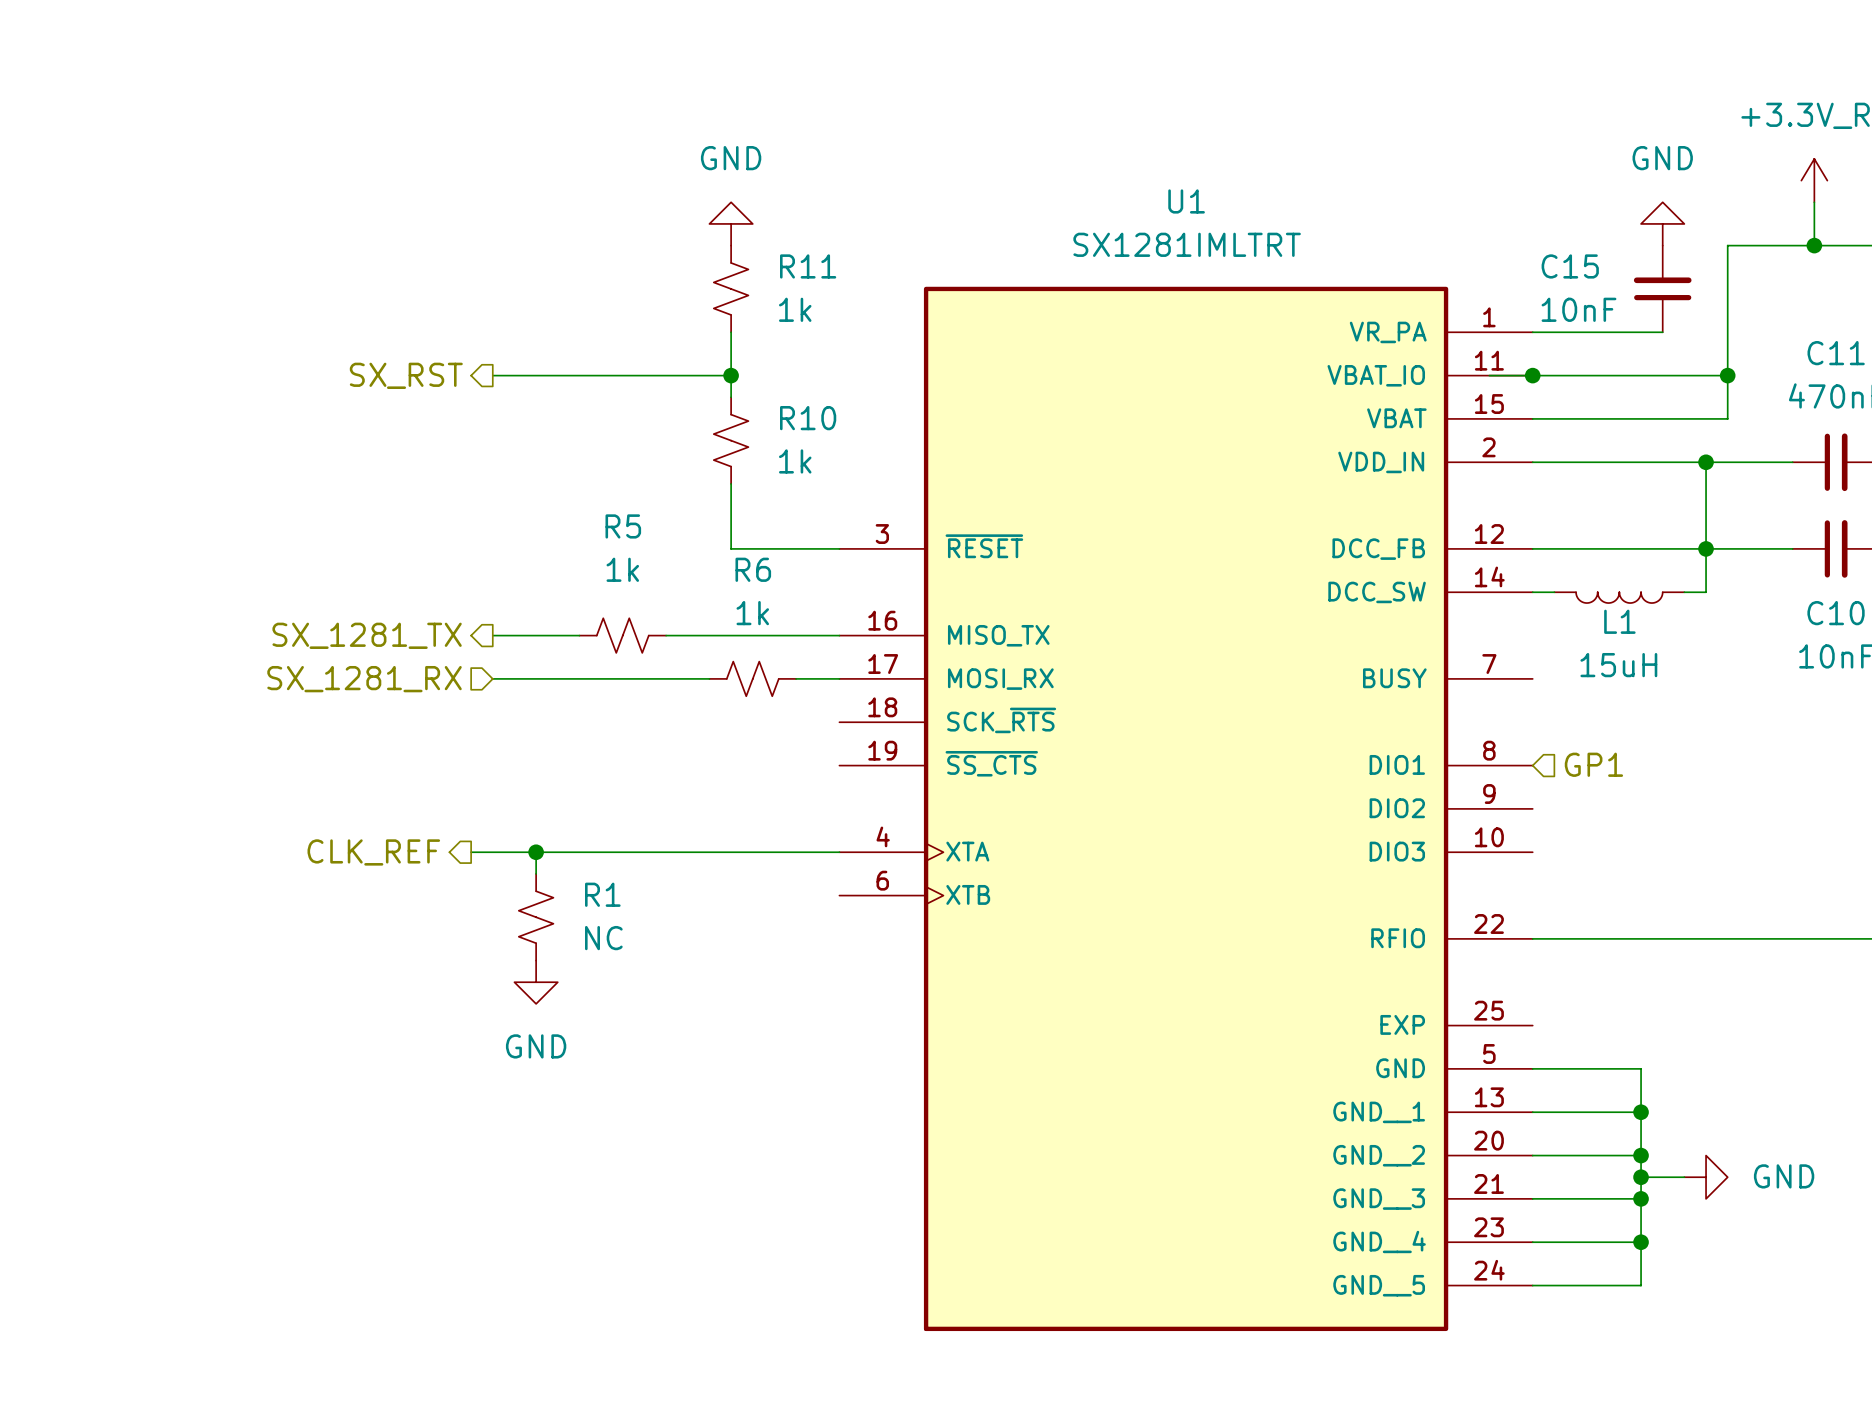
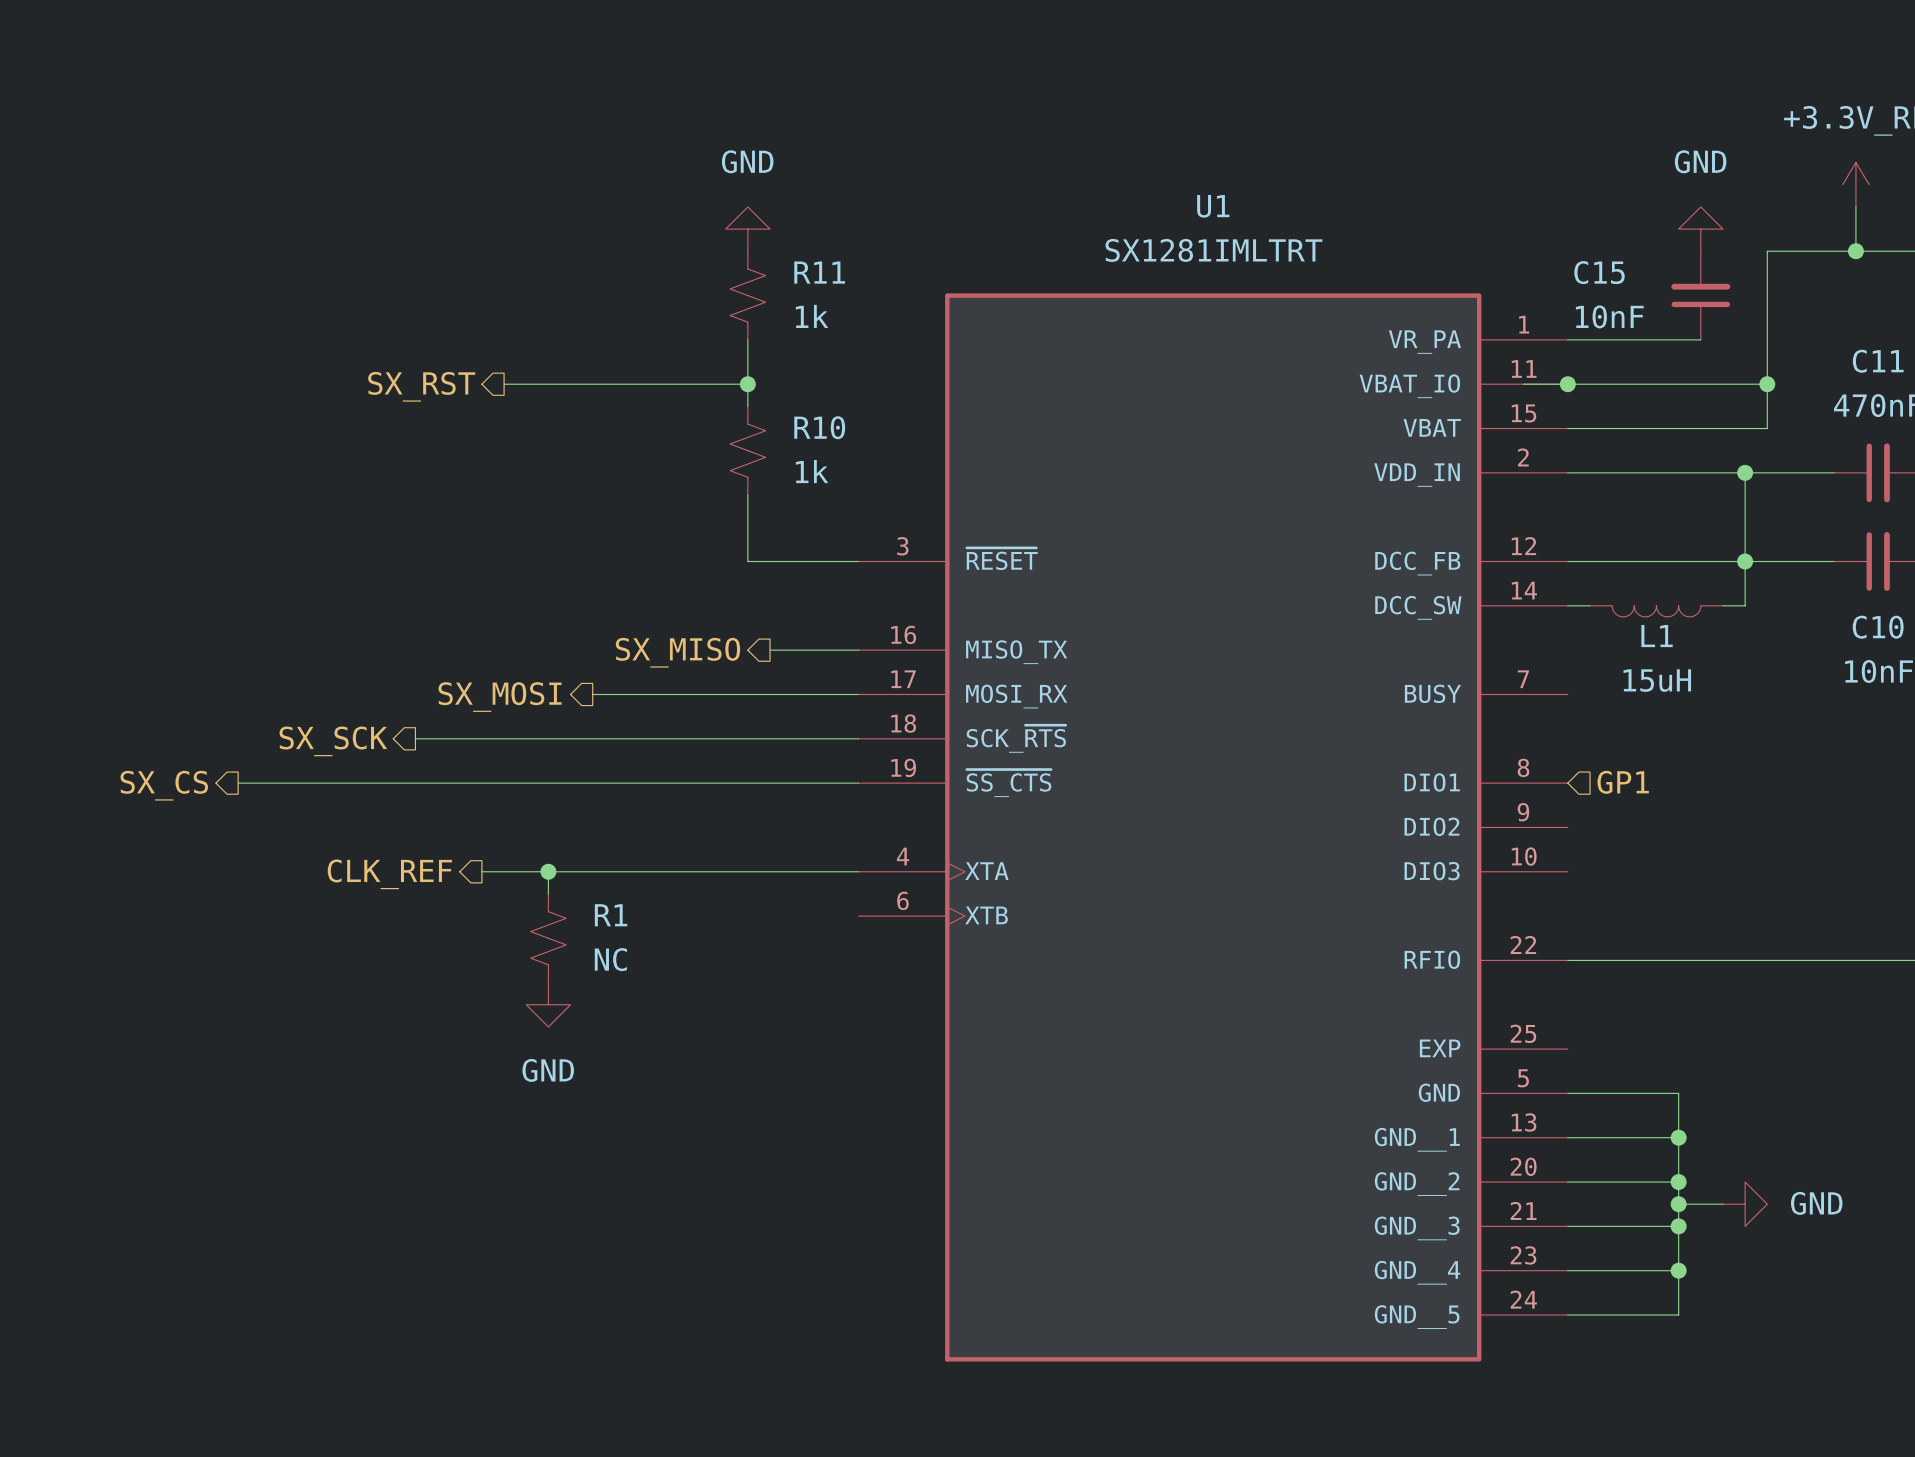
hierarchical label: SX_1281_TX (367, 635) -> none
wire: (492, 635) (579, 635) -> none
R5: 1k (622, 635) -> none
hierarchical label: none -> SX_MISO (677, 652)
wire: (666, 635) (752, 635) -> (725, 694) (814, 694)
wire: (492, 678) (579, 678) -> none
R6: 1k (752, 678) -> none
hierarchical label: SX_1281_RX (364, 679) -> none
hierarchical label: none -> SX_MOSI (500, 697)
hierarchical label: none -> SX_SCK (333, 741)
wire: none -> (415, 738) (858, 738)
hierarchical label: none -> SX_CS (164, 785)
wire: none -> (238, 783) (858, 783)

